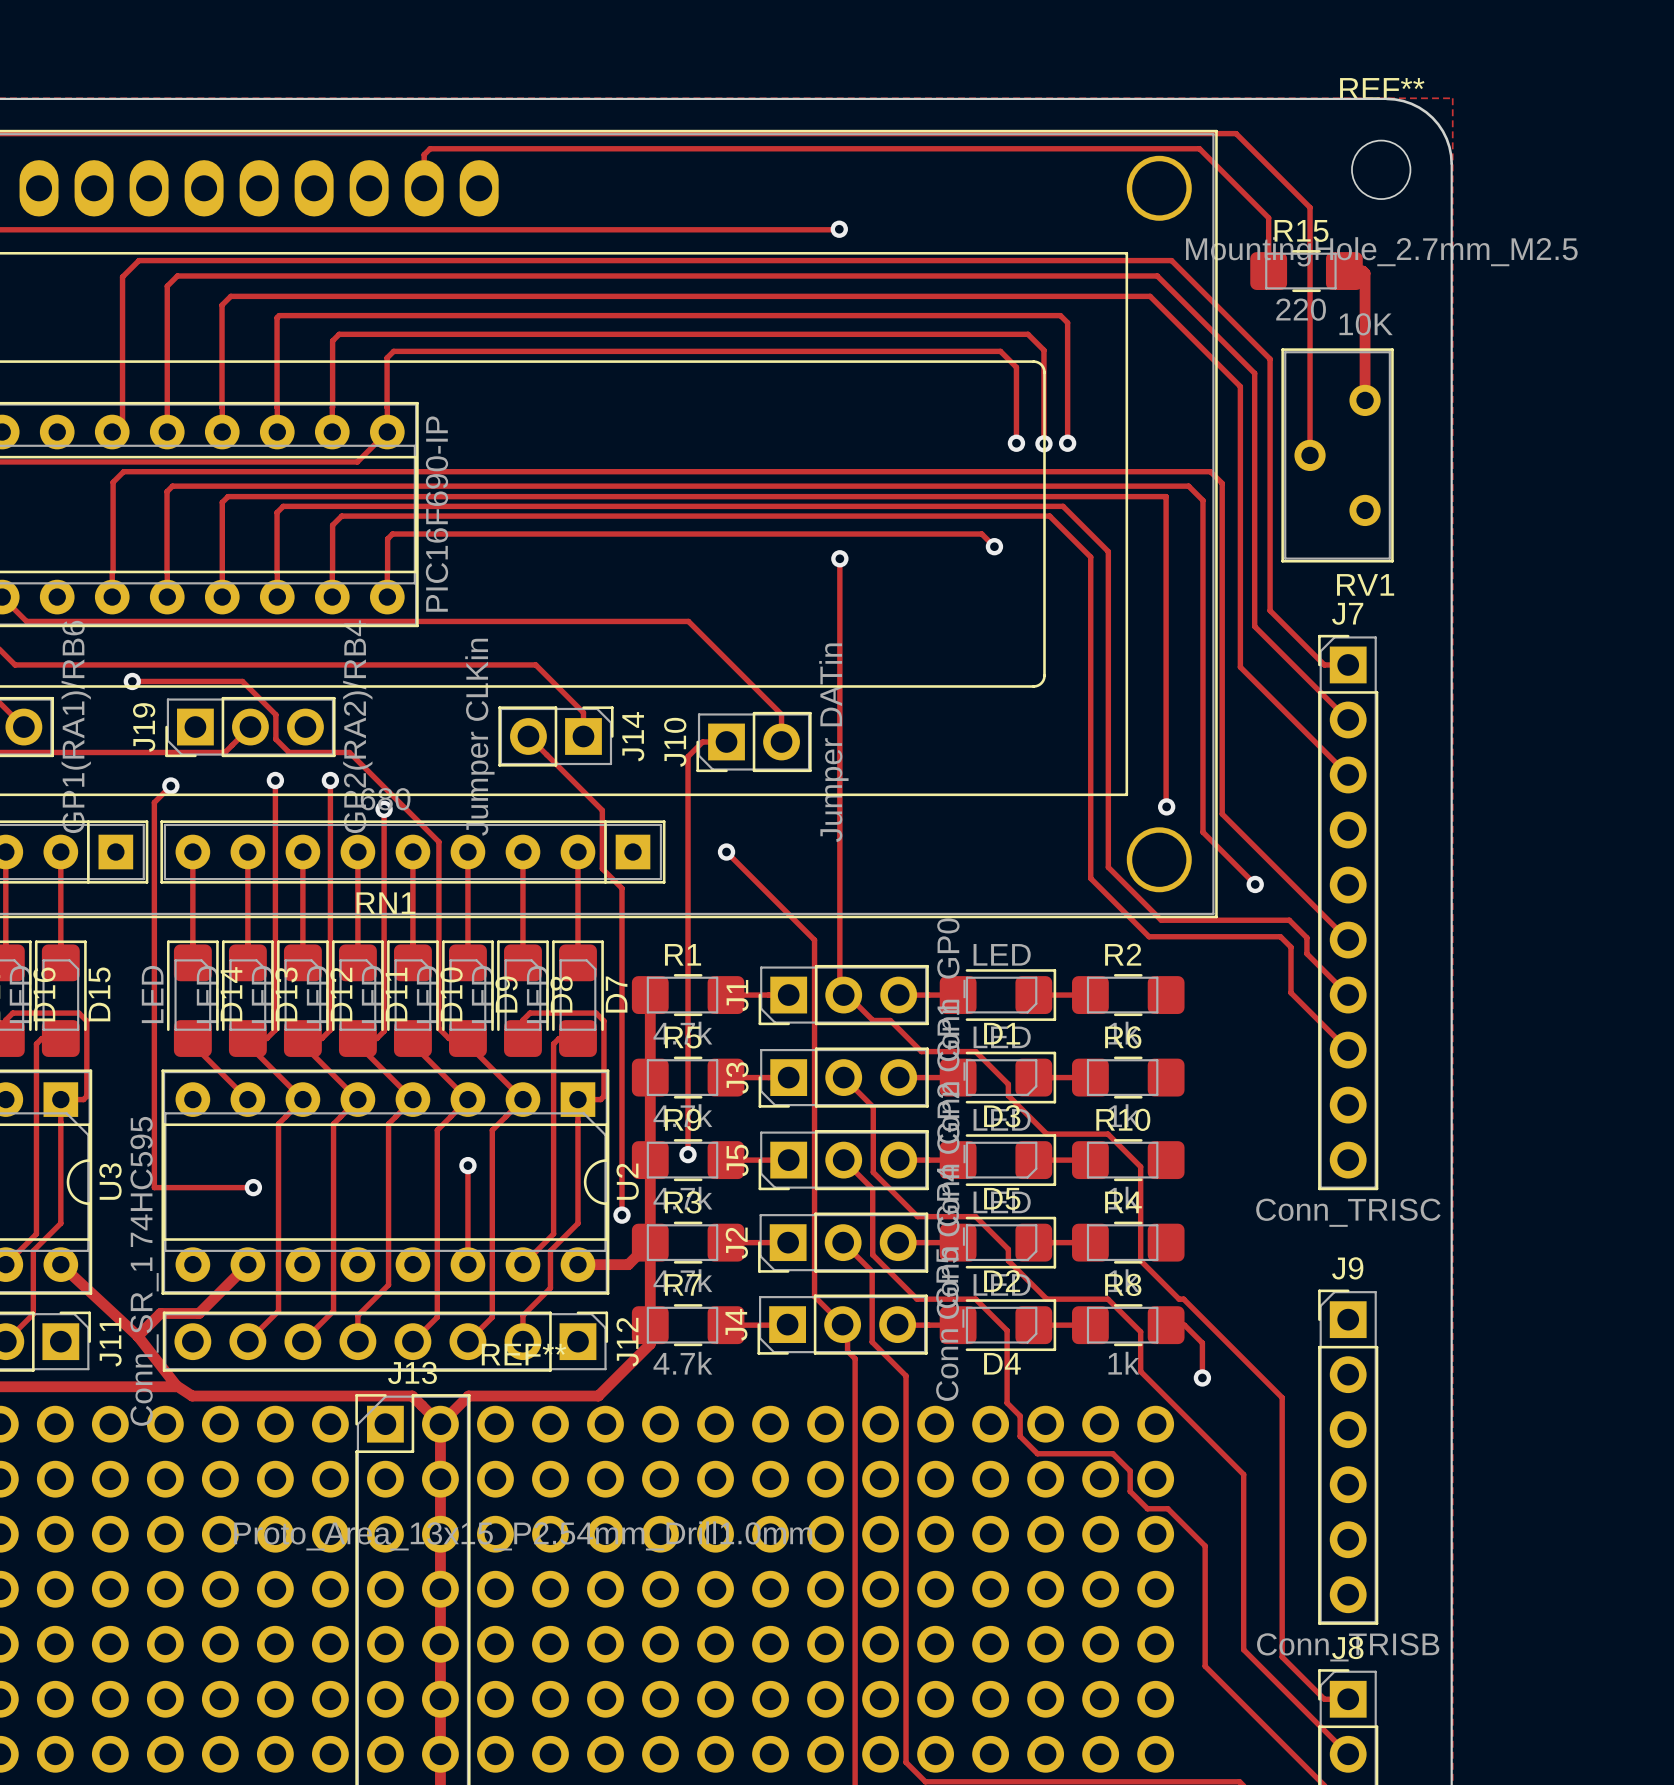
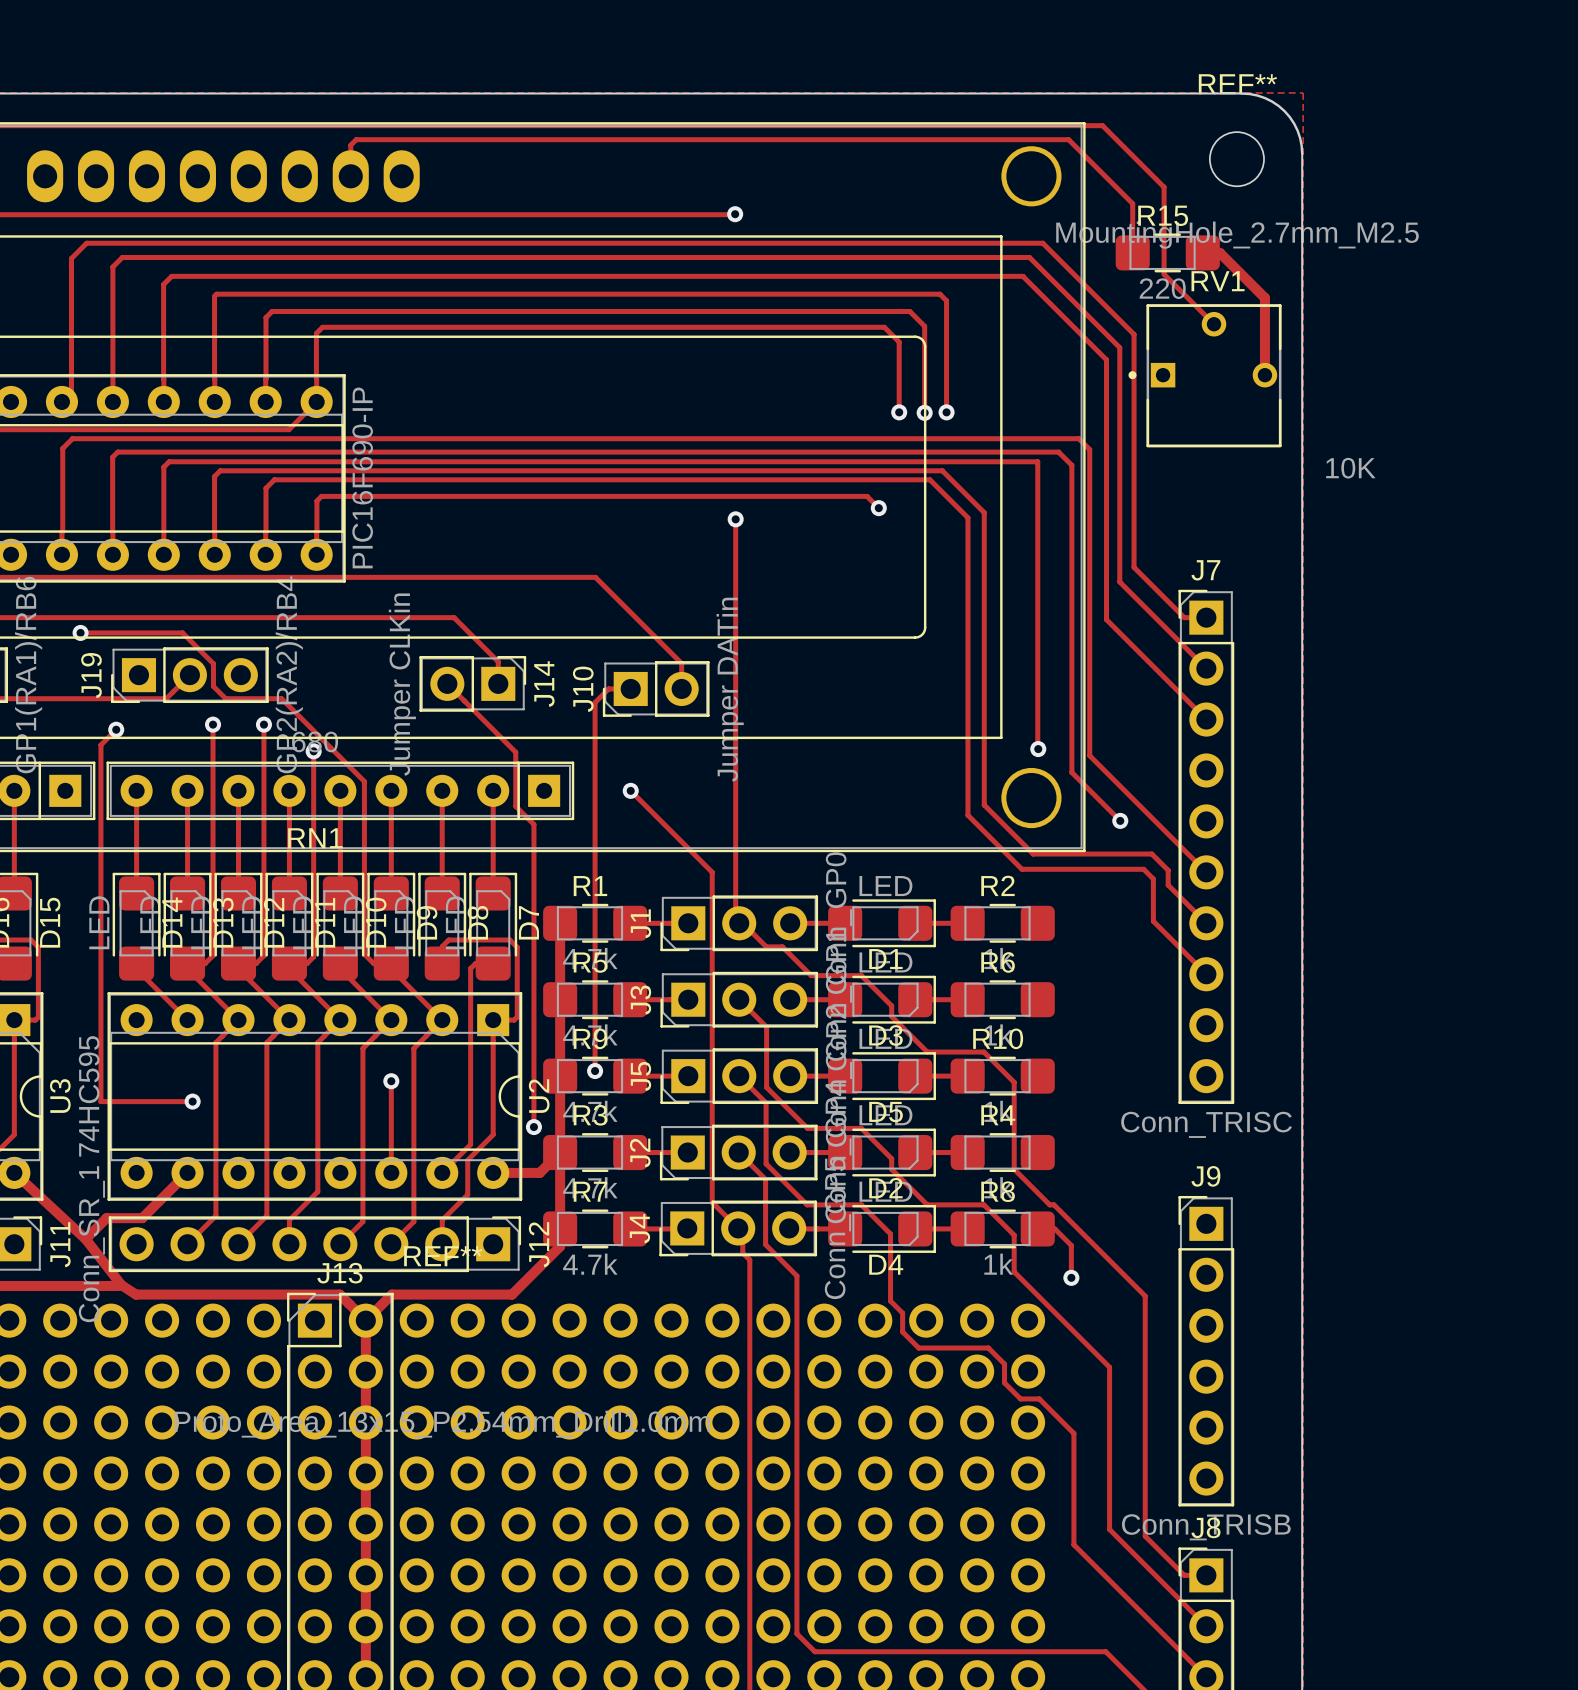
track: (1302, 200) (1310, 207) (1310, 455) -> (1164, 187) (1164, 274) (1214, 324)
track: (1365, 273) (1365, 400) -> (1221, 255) (1264, 298) (1264, 375)
RV1 value position: 10K (1366, 324) -> 10K (1350, 468)
RV1 footprint: [1281, 348, 1394, 563] -> [1128, 304, 1282, 448]
RV1 name position: RV1 (1365, 584) -> RV1 (1218, 281)

